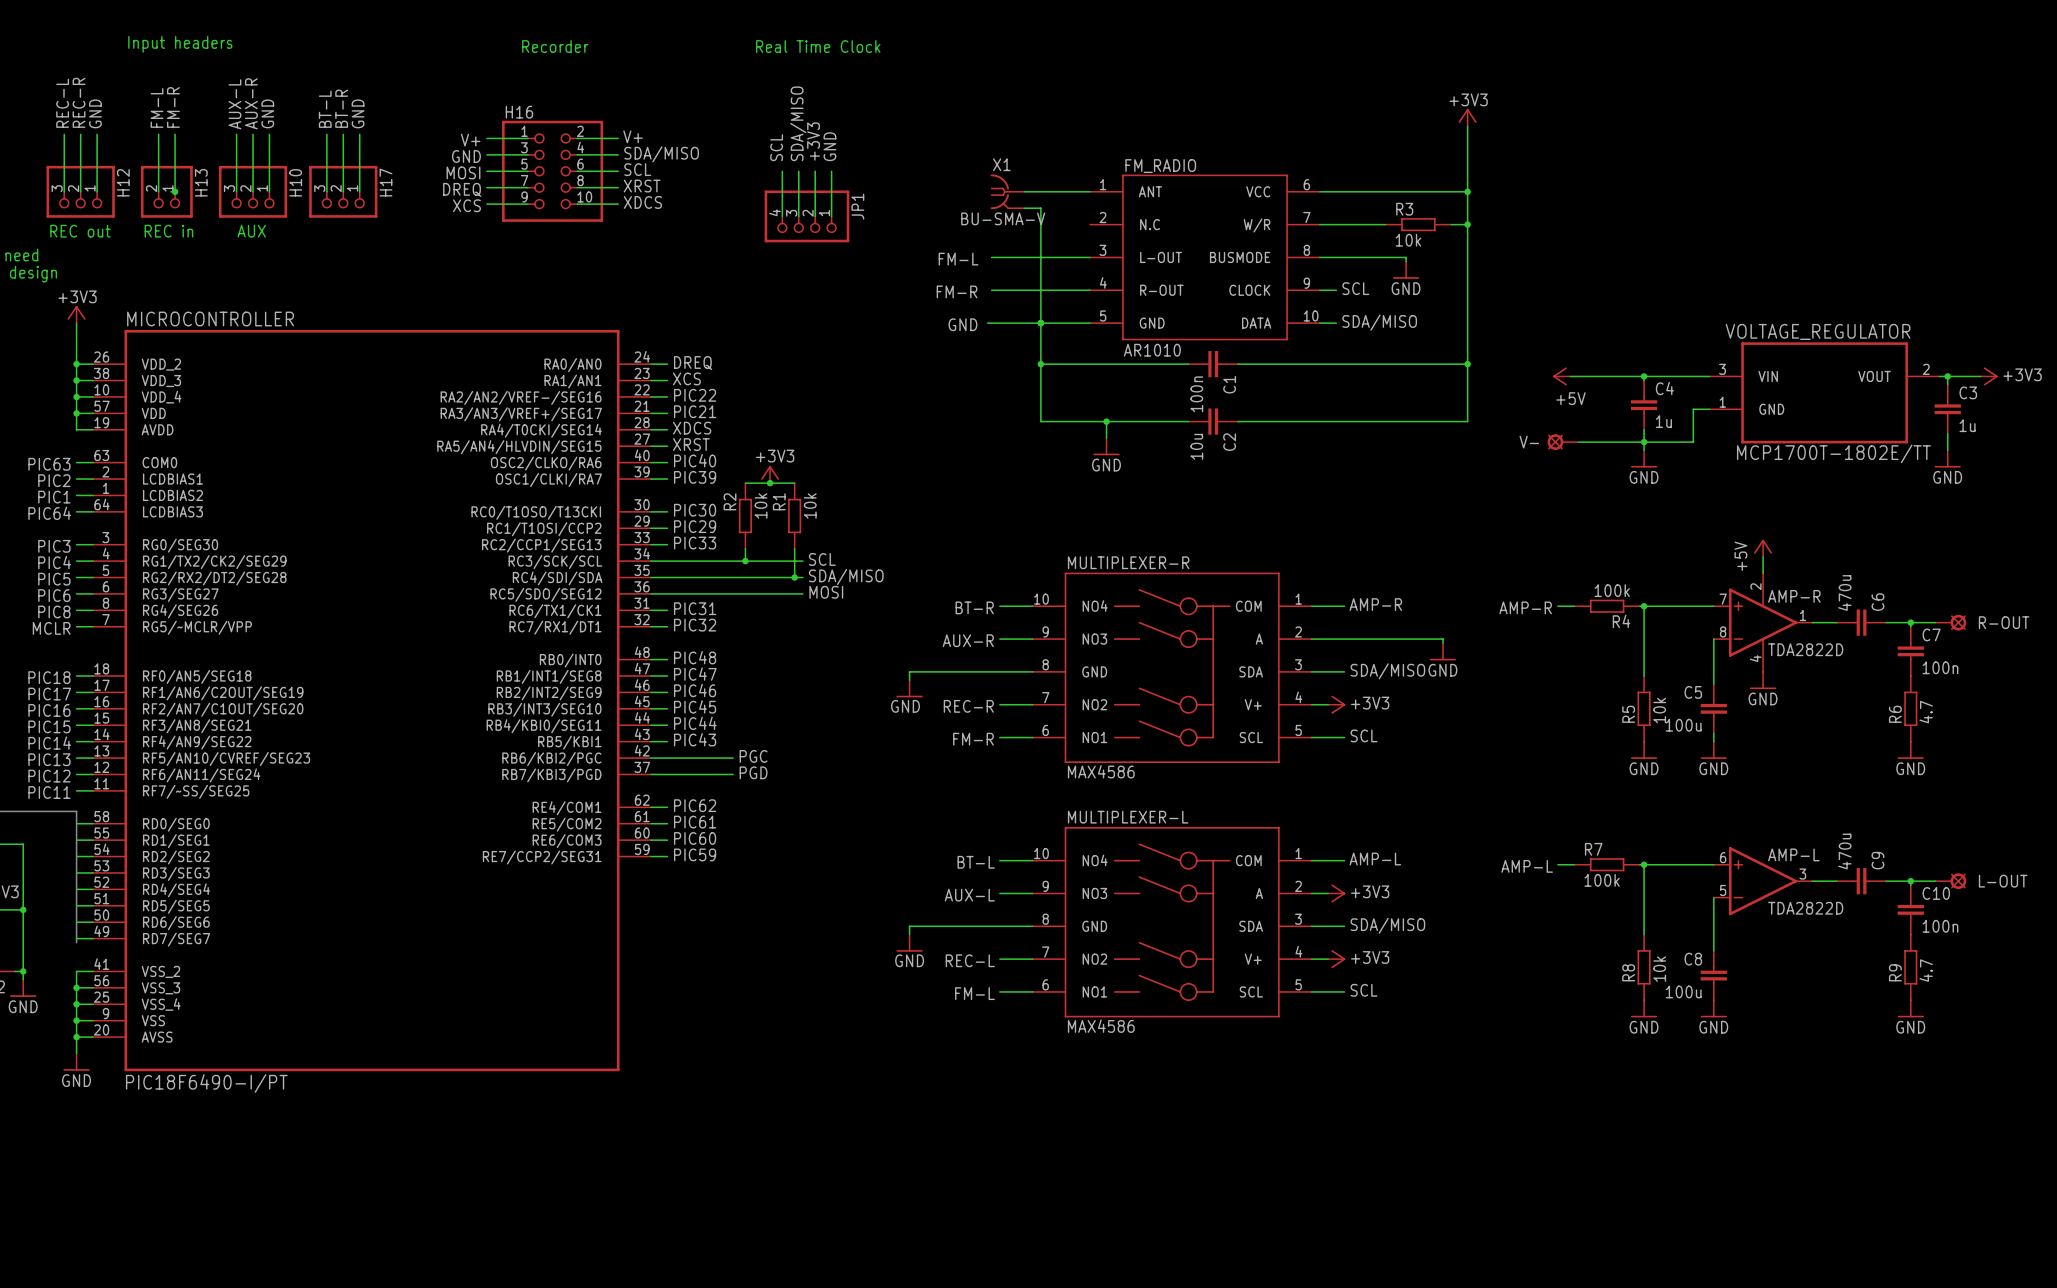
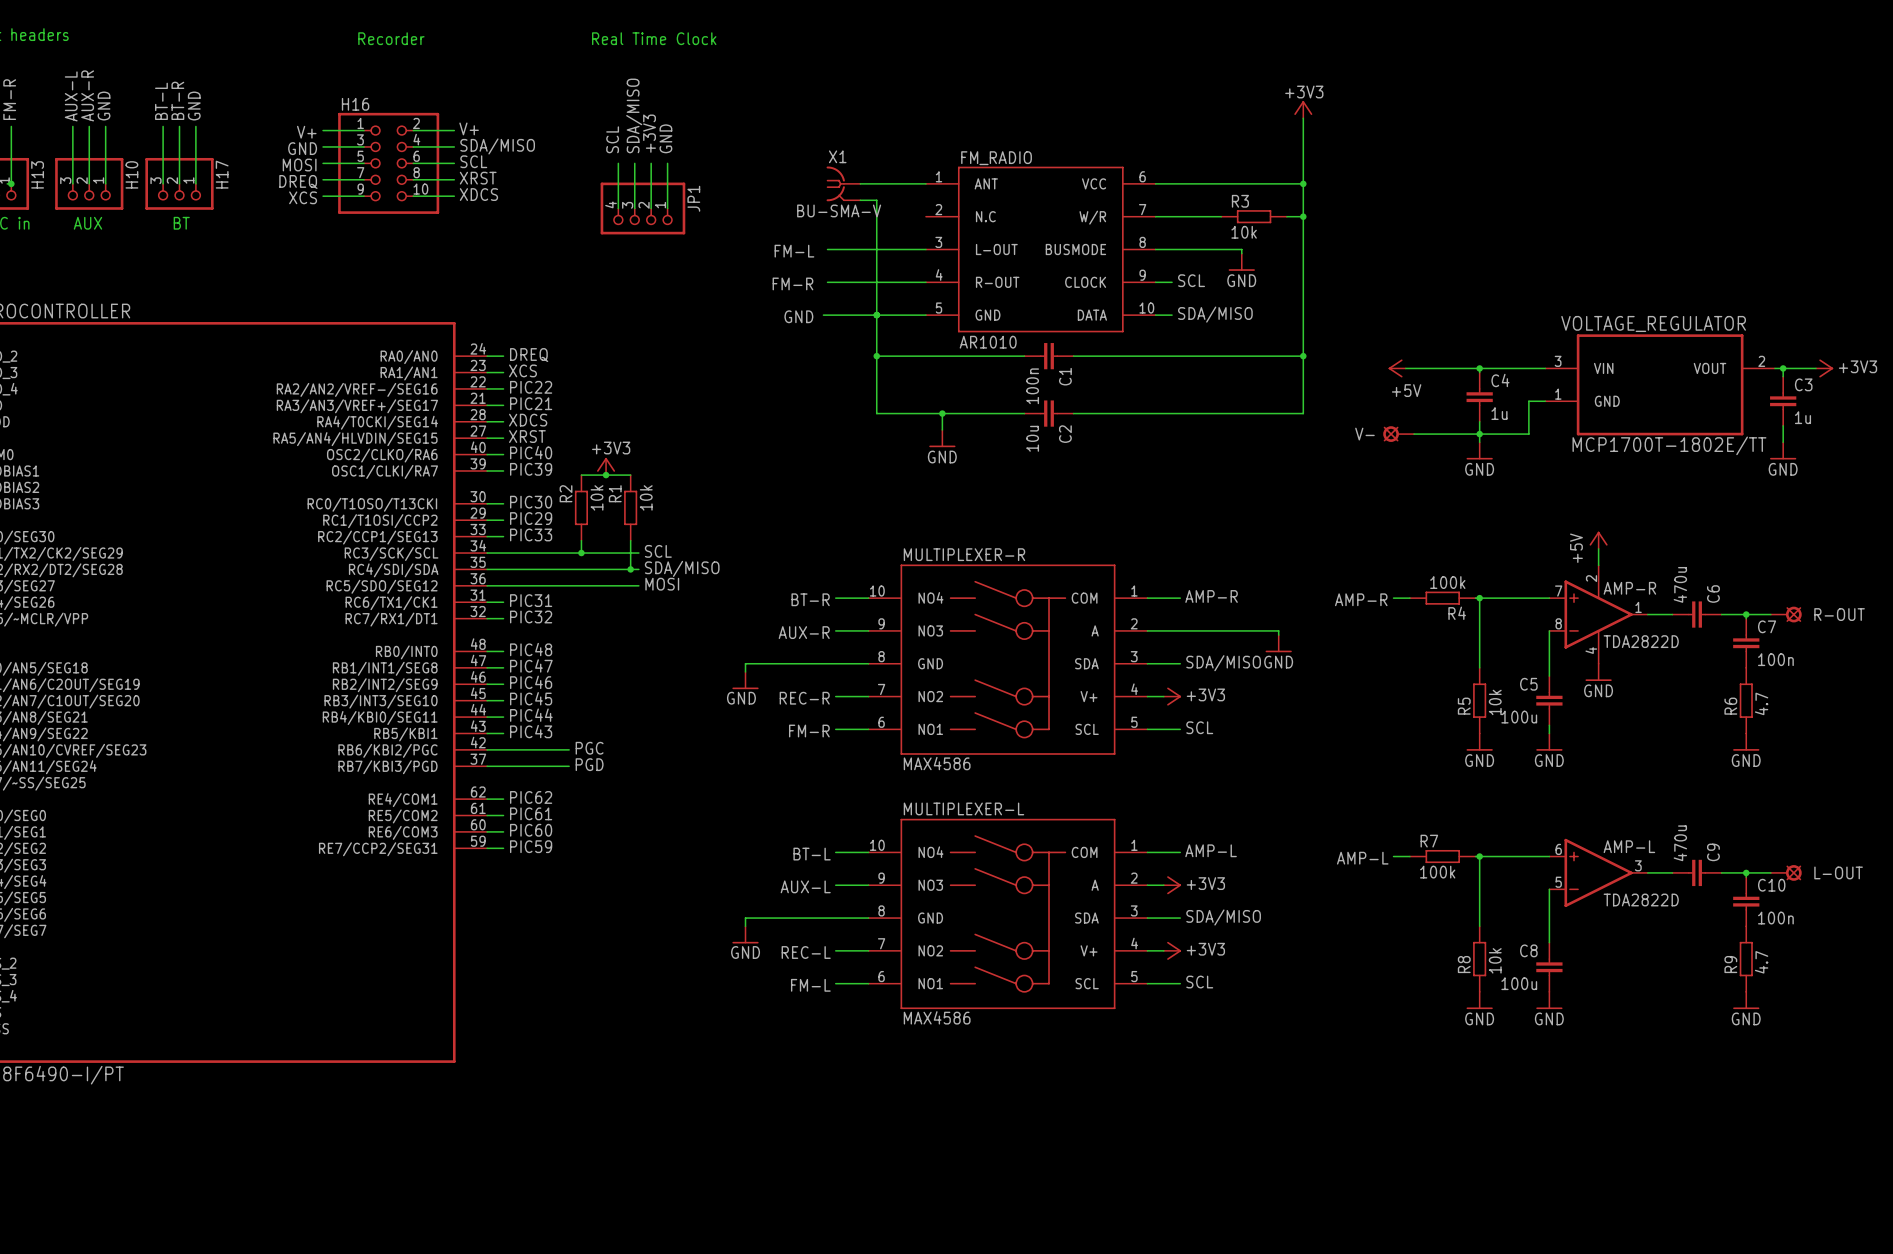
text: none -> BT (181, 223)

